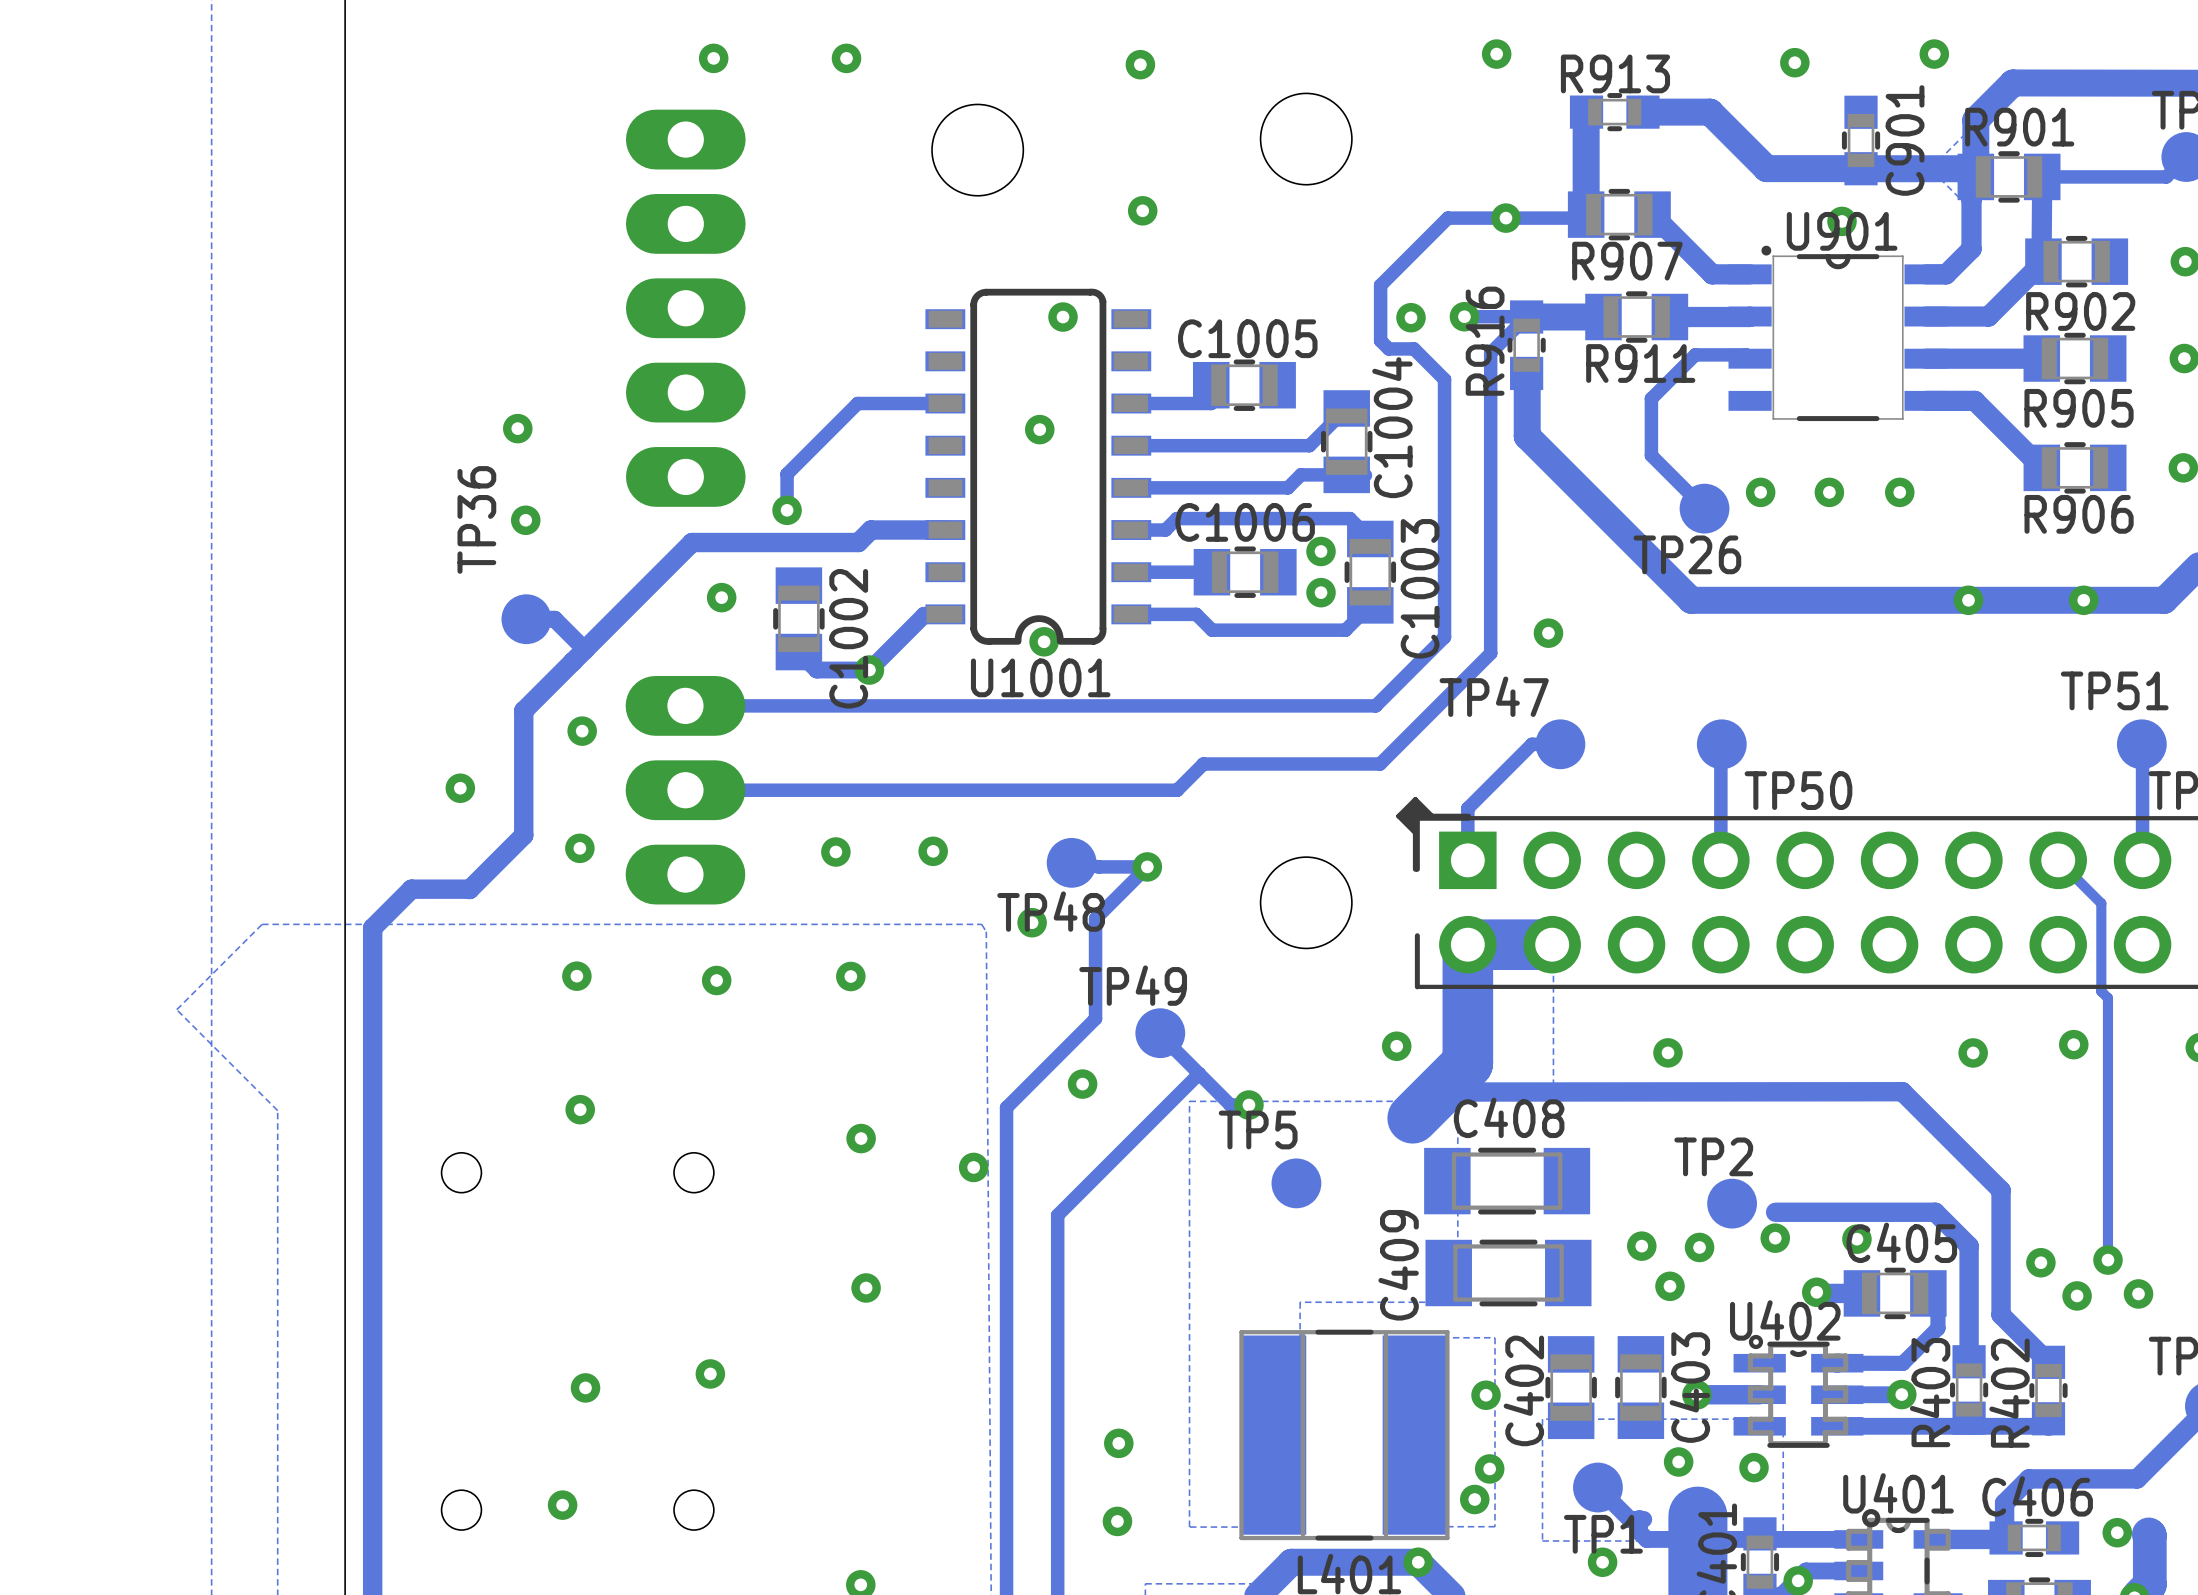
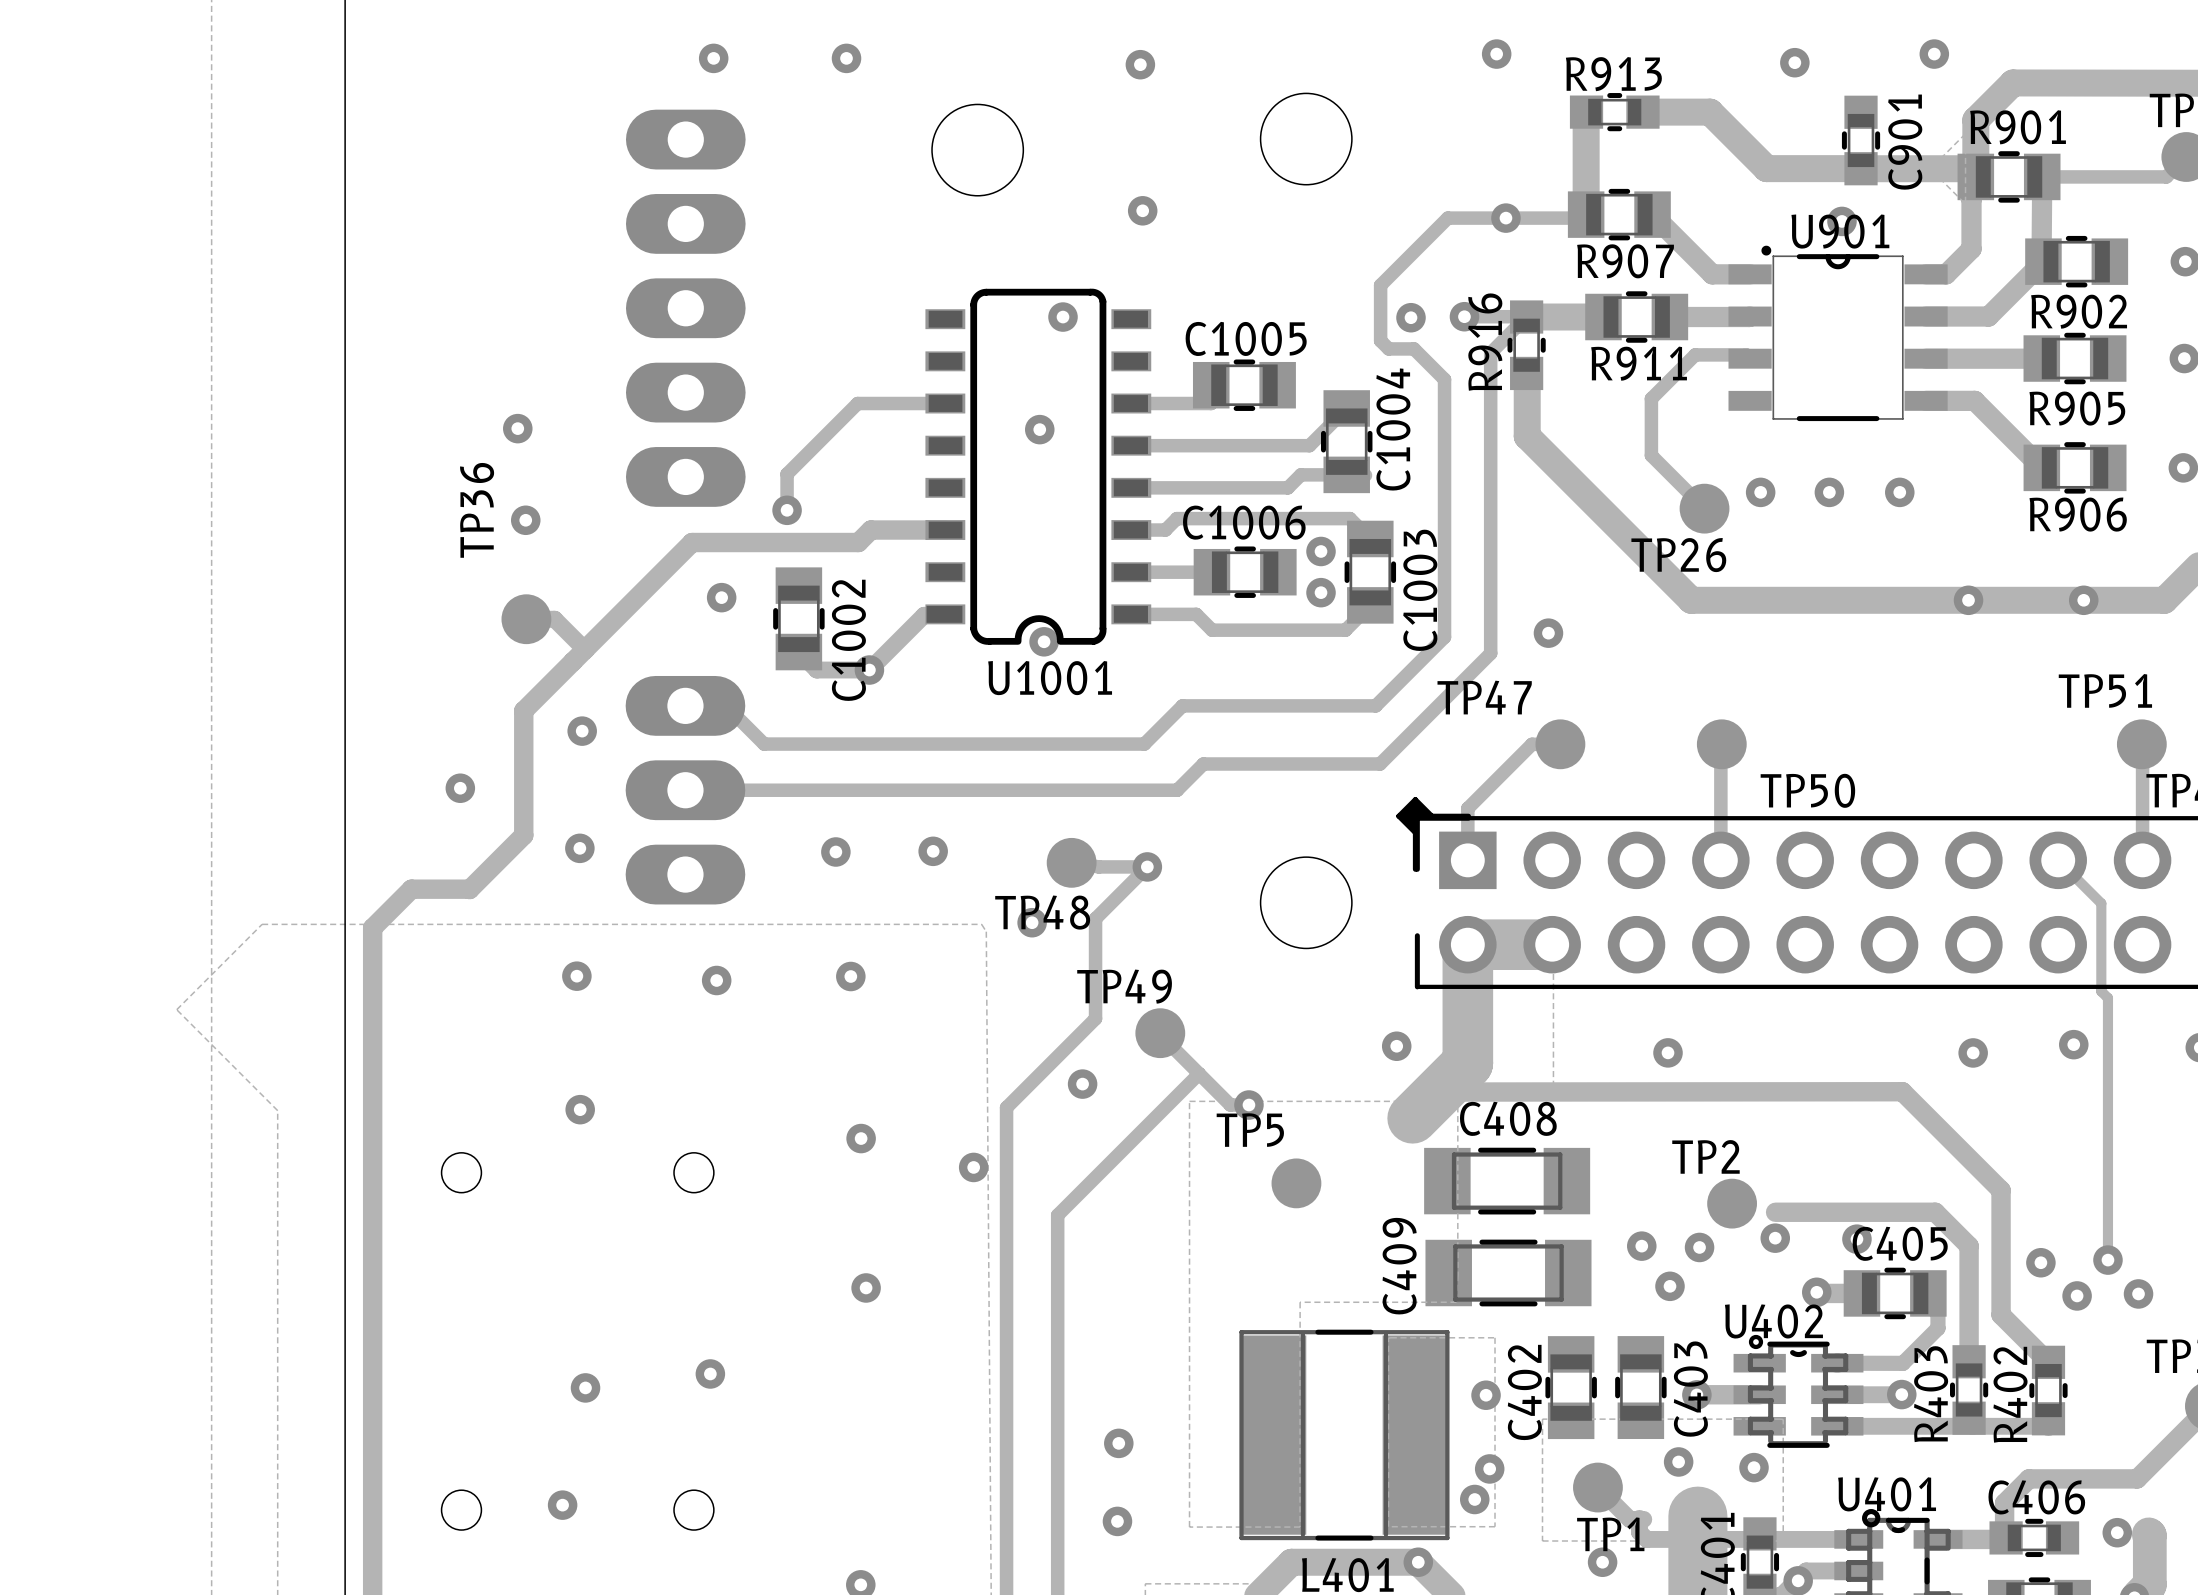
track: (1182, 705) (685, 705) -> (1182, 705) (1144, 744) (764, 744) (729, 709) (689, 709) (685, 705)

